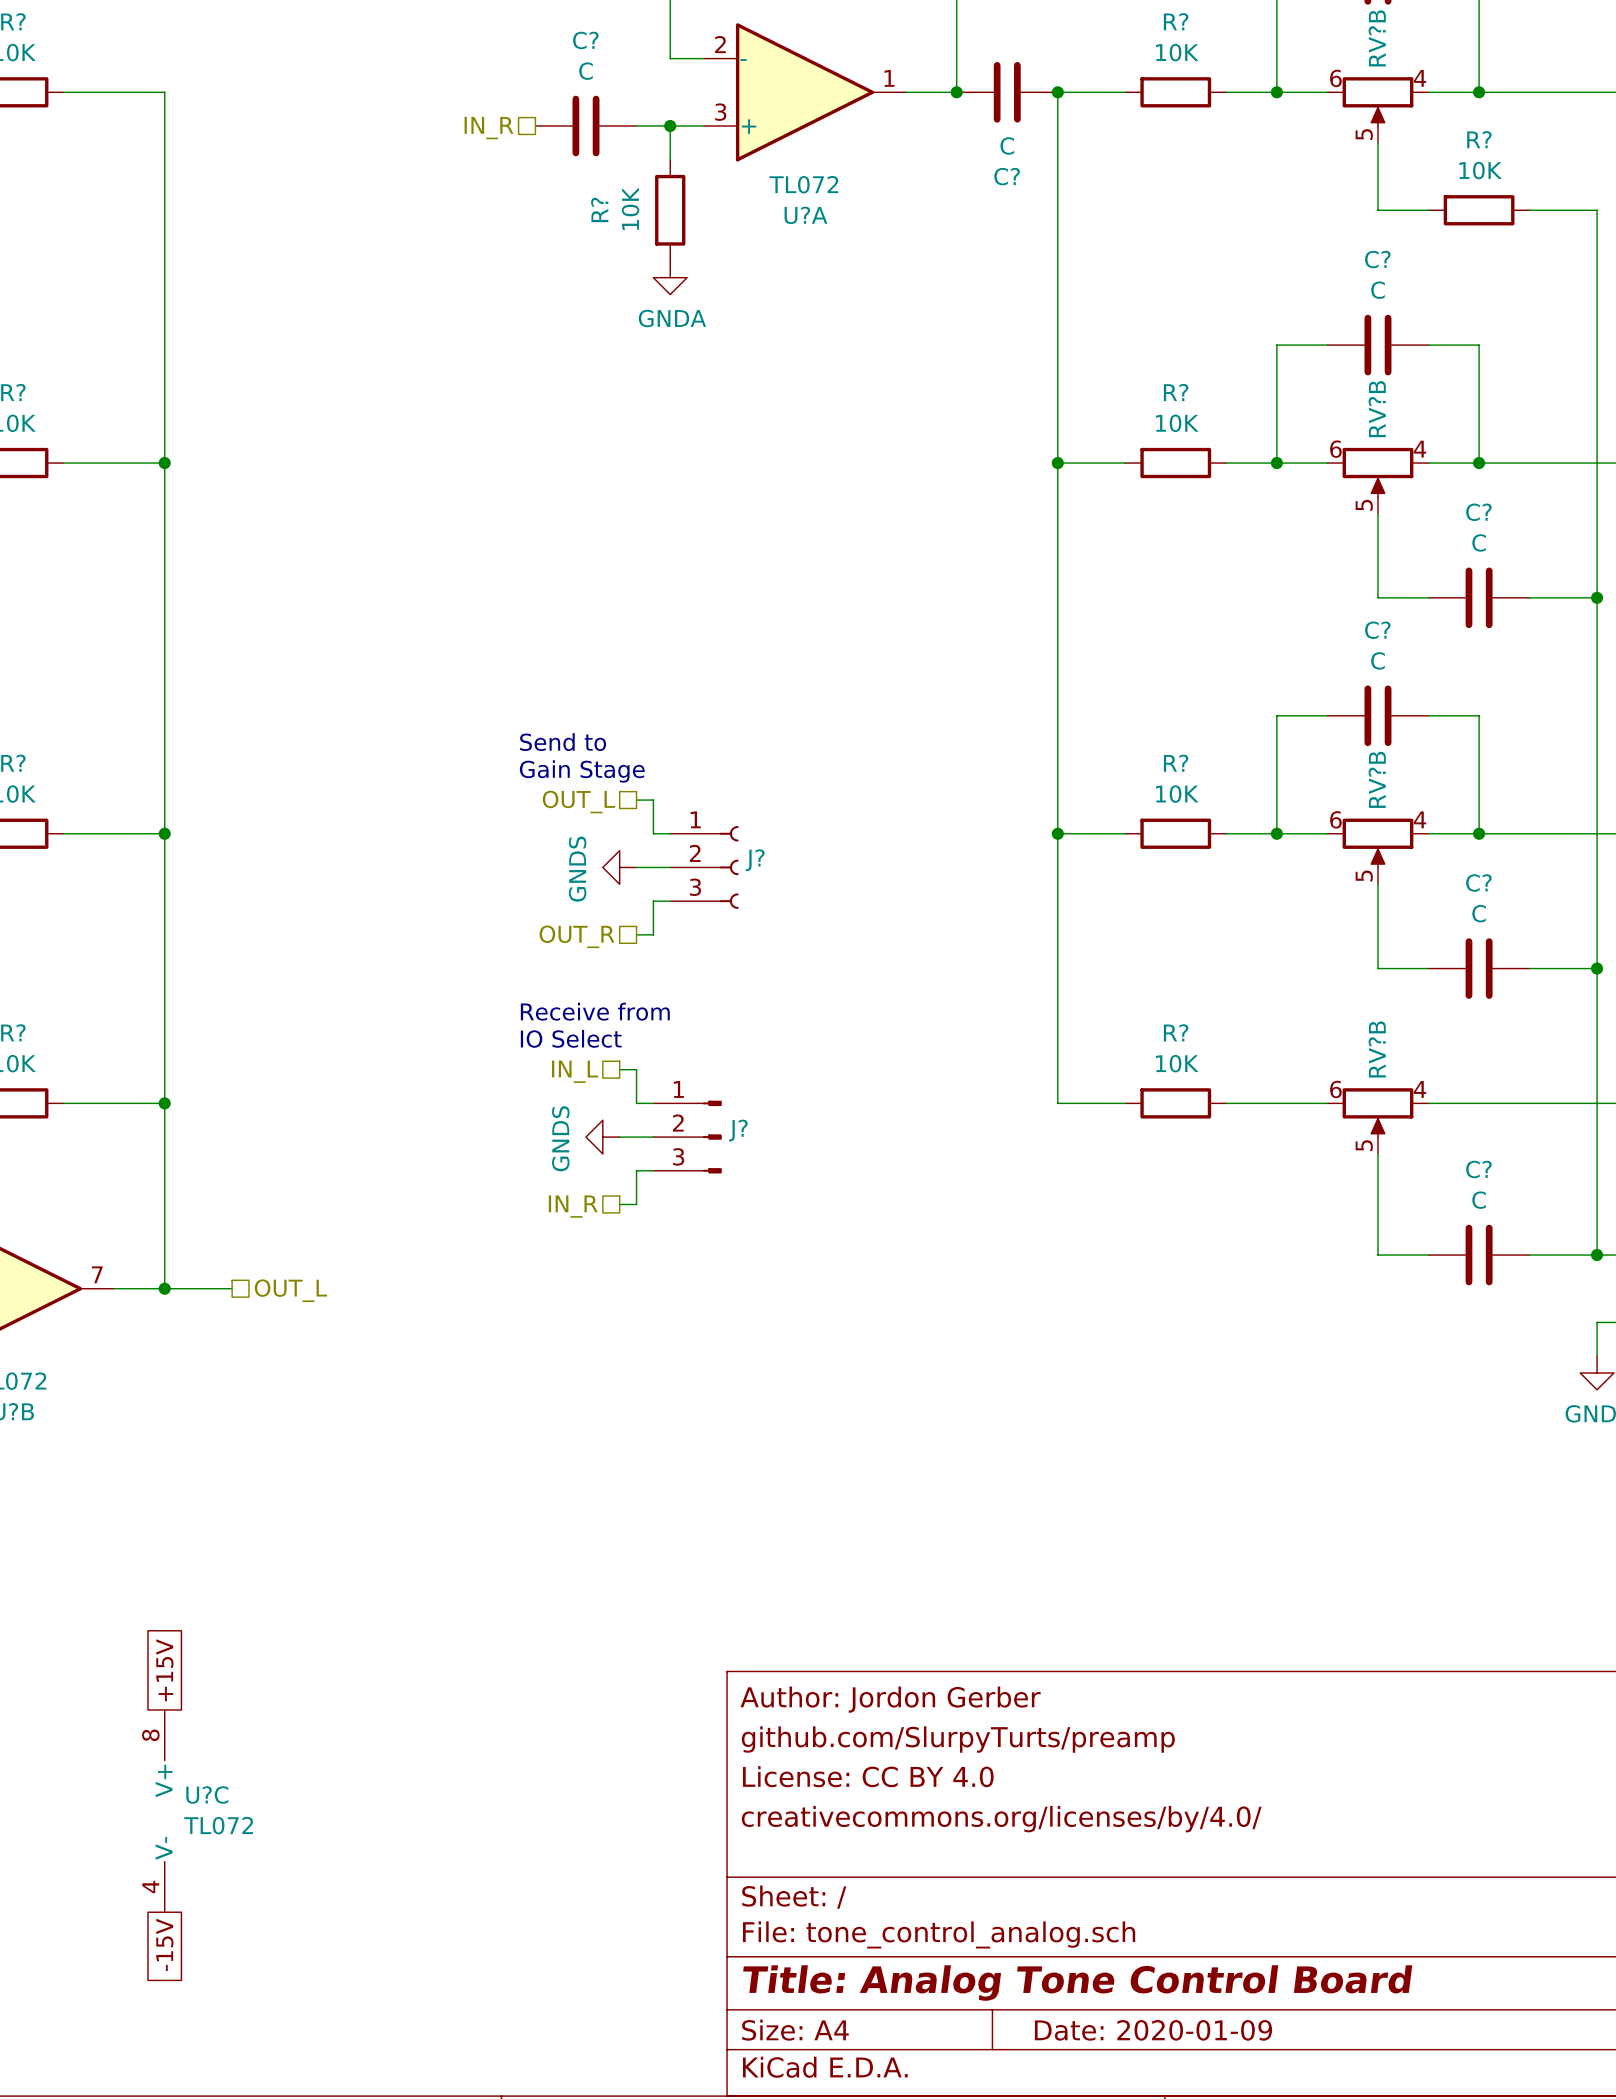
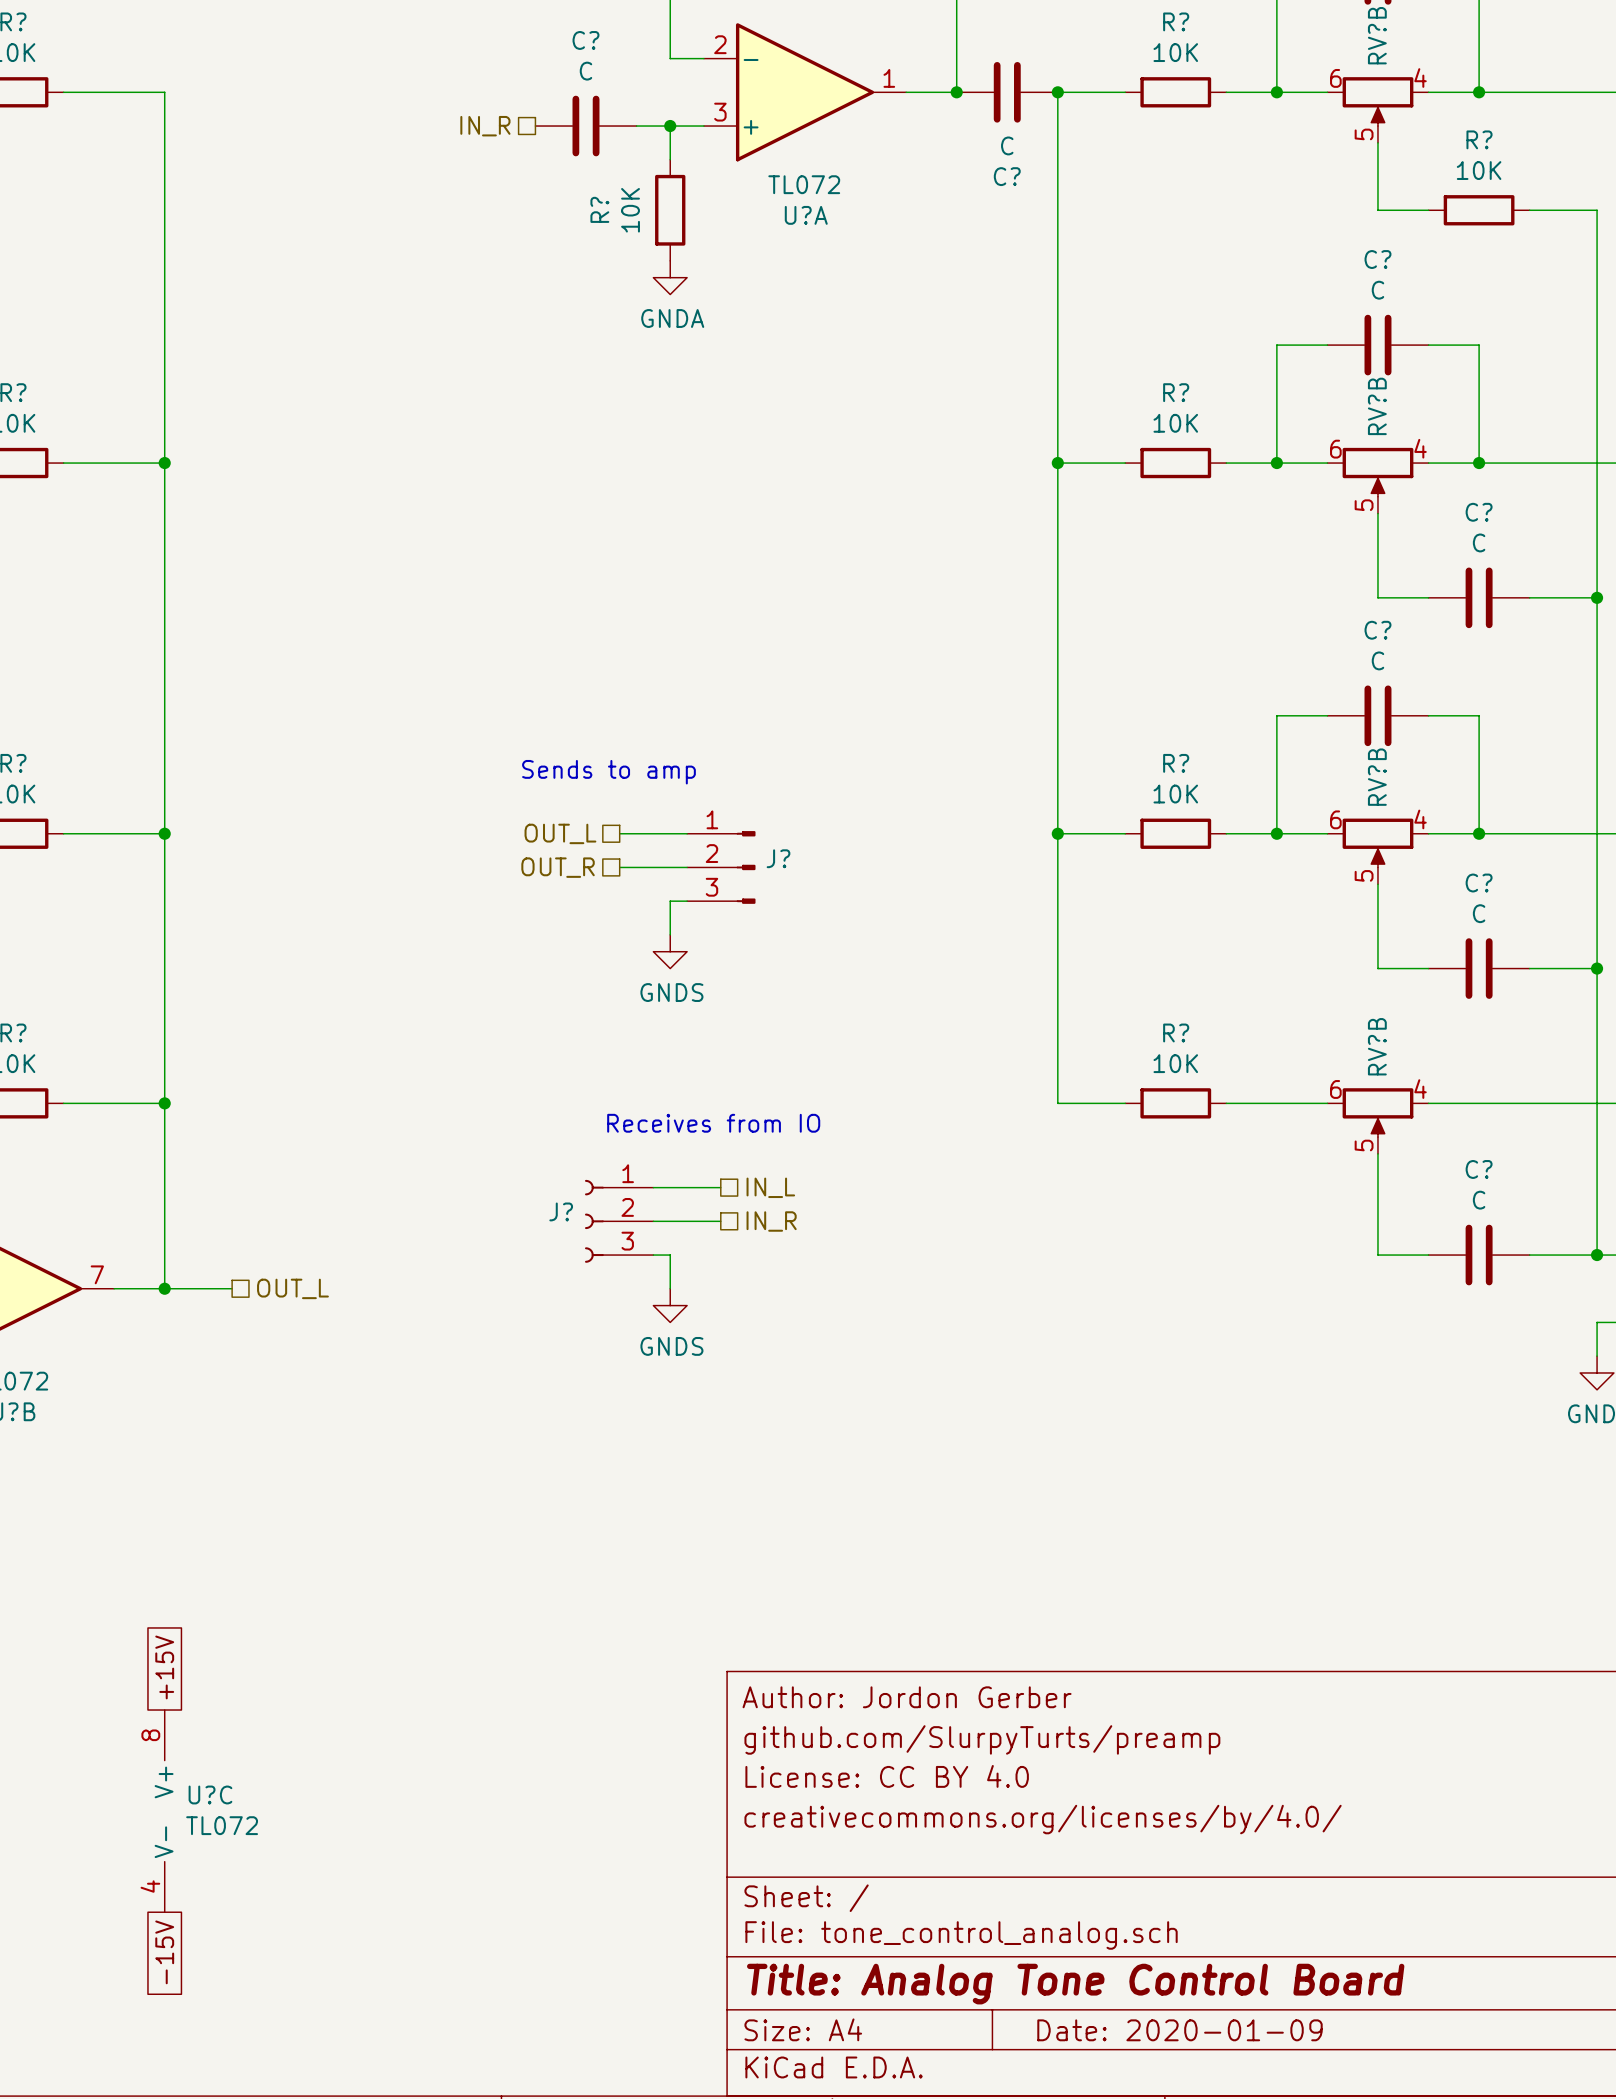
text: Send to (563, 742) -> none
text: Gain Stage (582, 771) -> Sends to amp (608, 772)
wire: (636, 800) (653, 800) (653, 833) -> (619, 833) (653, 833)
hierarchical label position: OUT_L (578, 802) -> OUT_L (560, 833)
power symbol rotation: 0° (619, 867) -> 90° counterclockwise (670, 951)
power symbol position: GNDS (619, 867) -> GNDS (670, 951)
J?: (704, 867) -> none
wire: (670, 901) (653, 901) (653, 934) (636, 934) -> none
wire: none -> (687, 901) (670, 901) (670, 934)
hierarchical label position: OUT_R (577, 936) -> OUT_R (558, 867)
text: Receive from (595, 1011) -> none
text: IO Select (571, 1038) -> none
wire: (619, 1069) (636, 1069) (636, 1103) (653, 1103) -> none
hierarchical label rotation: 0° (575, 1071) -> 180° (770, 1187)
hierarchical label position: IN_L (575, 1071) -> IN_L (770, 1187)
text: none -> Receives from IO (713, 1123)
power symbol: GNDS (602, 1137) -> none
wire: (619, 1137) (653, 1137) -> none
J? position: (687, 1137) -> (721, 867)
wire: (653, 1170) (636, 1170) (636, 1204) (619, 1204) -> none
wire: none -> (653, 1187) (720, 1187)
hierarchical label rotation: 0° (573, 1206) -> 180° (771, 1221)
hierarchical label position: IN_R (573, 1206) -> IN_R (771, 1221)
J?: none -> (619, 1221)
wire: none -> (653, 1221) (720, 1221)
wire: none -> (653, 1255) (670, 1255) (670, 1288)
power symbol: none -> GNDS (670, 1305)

